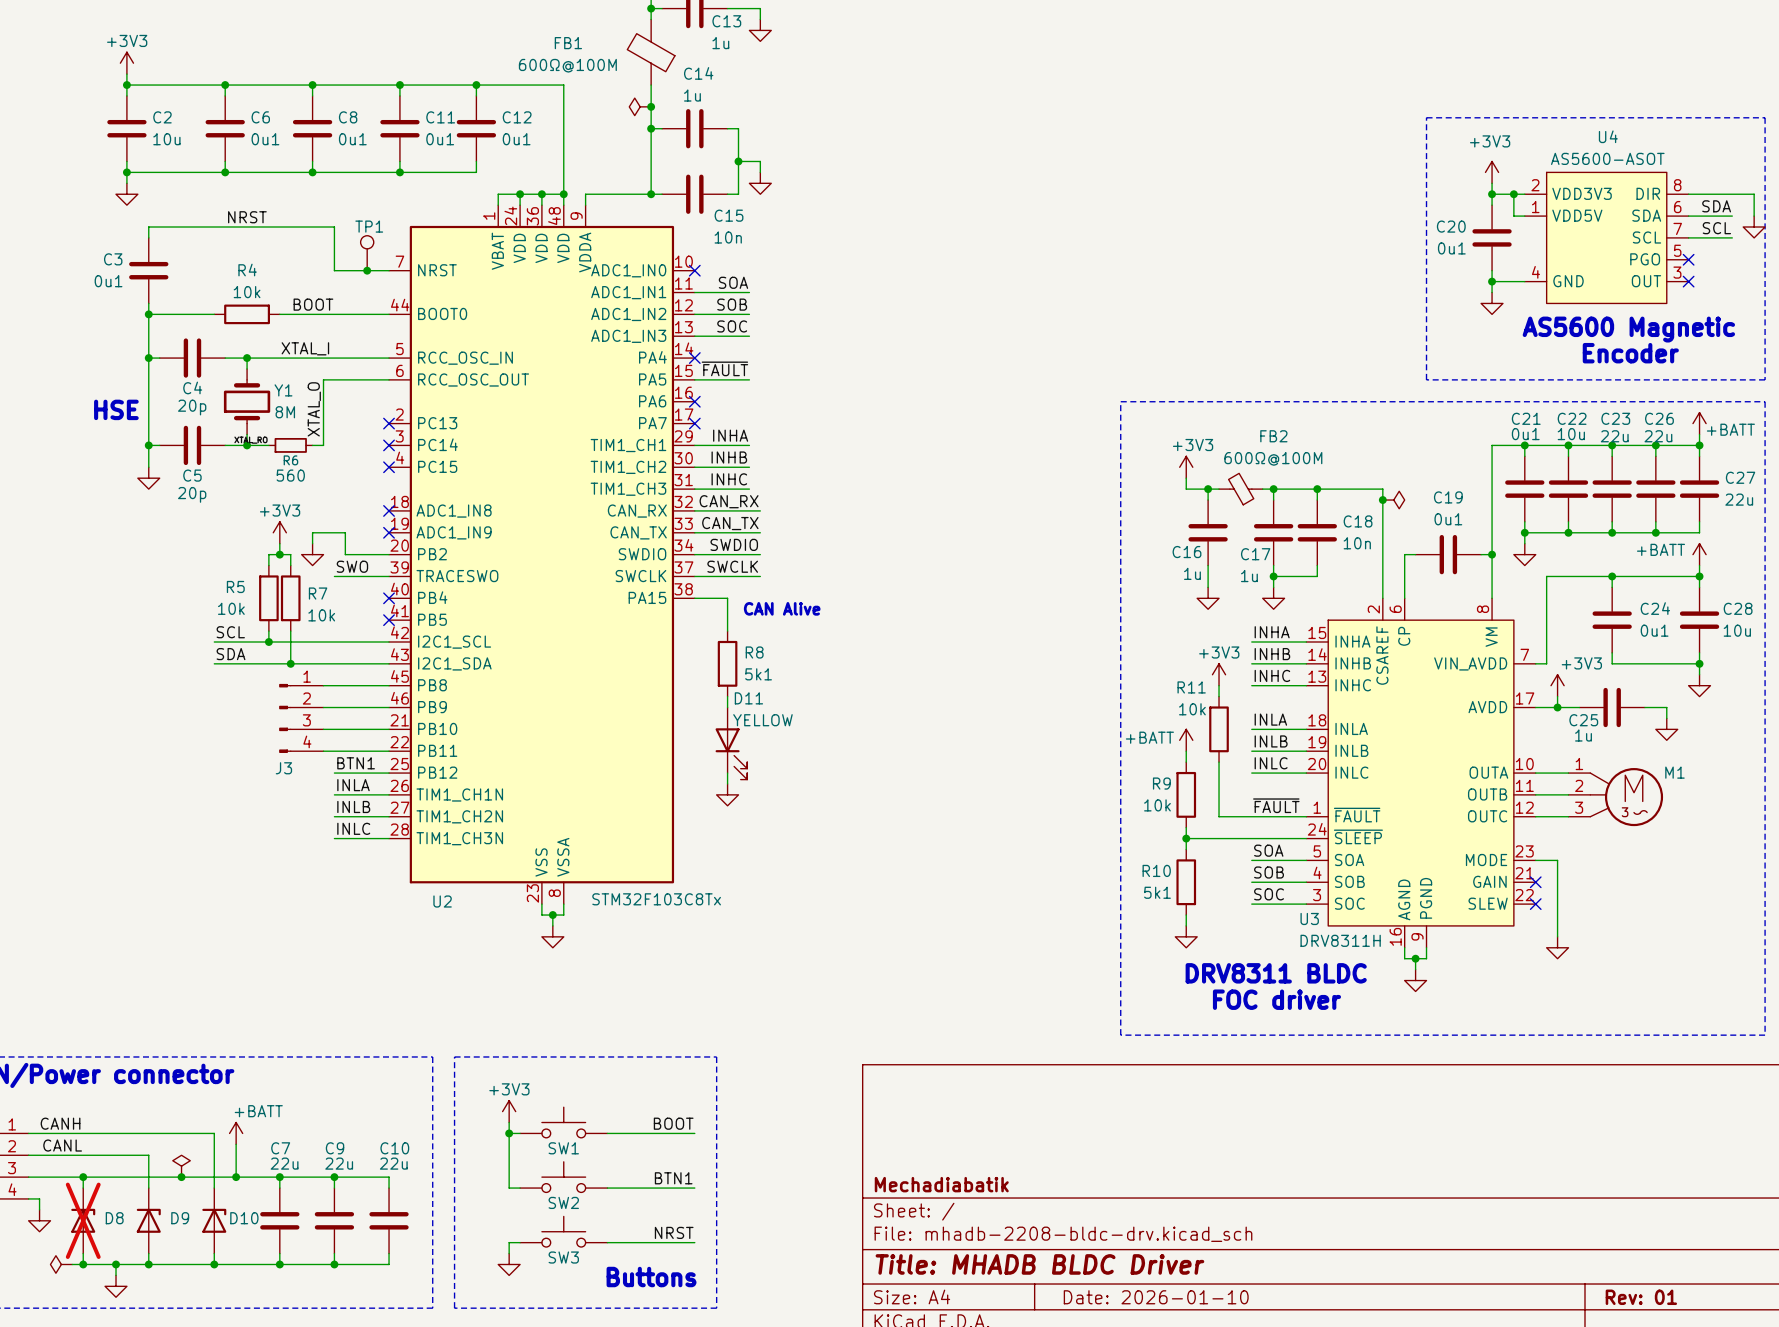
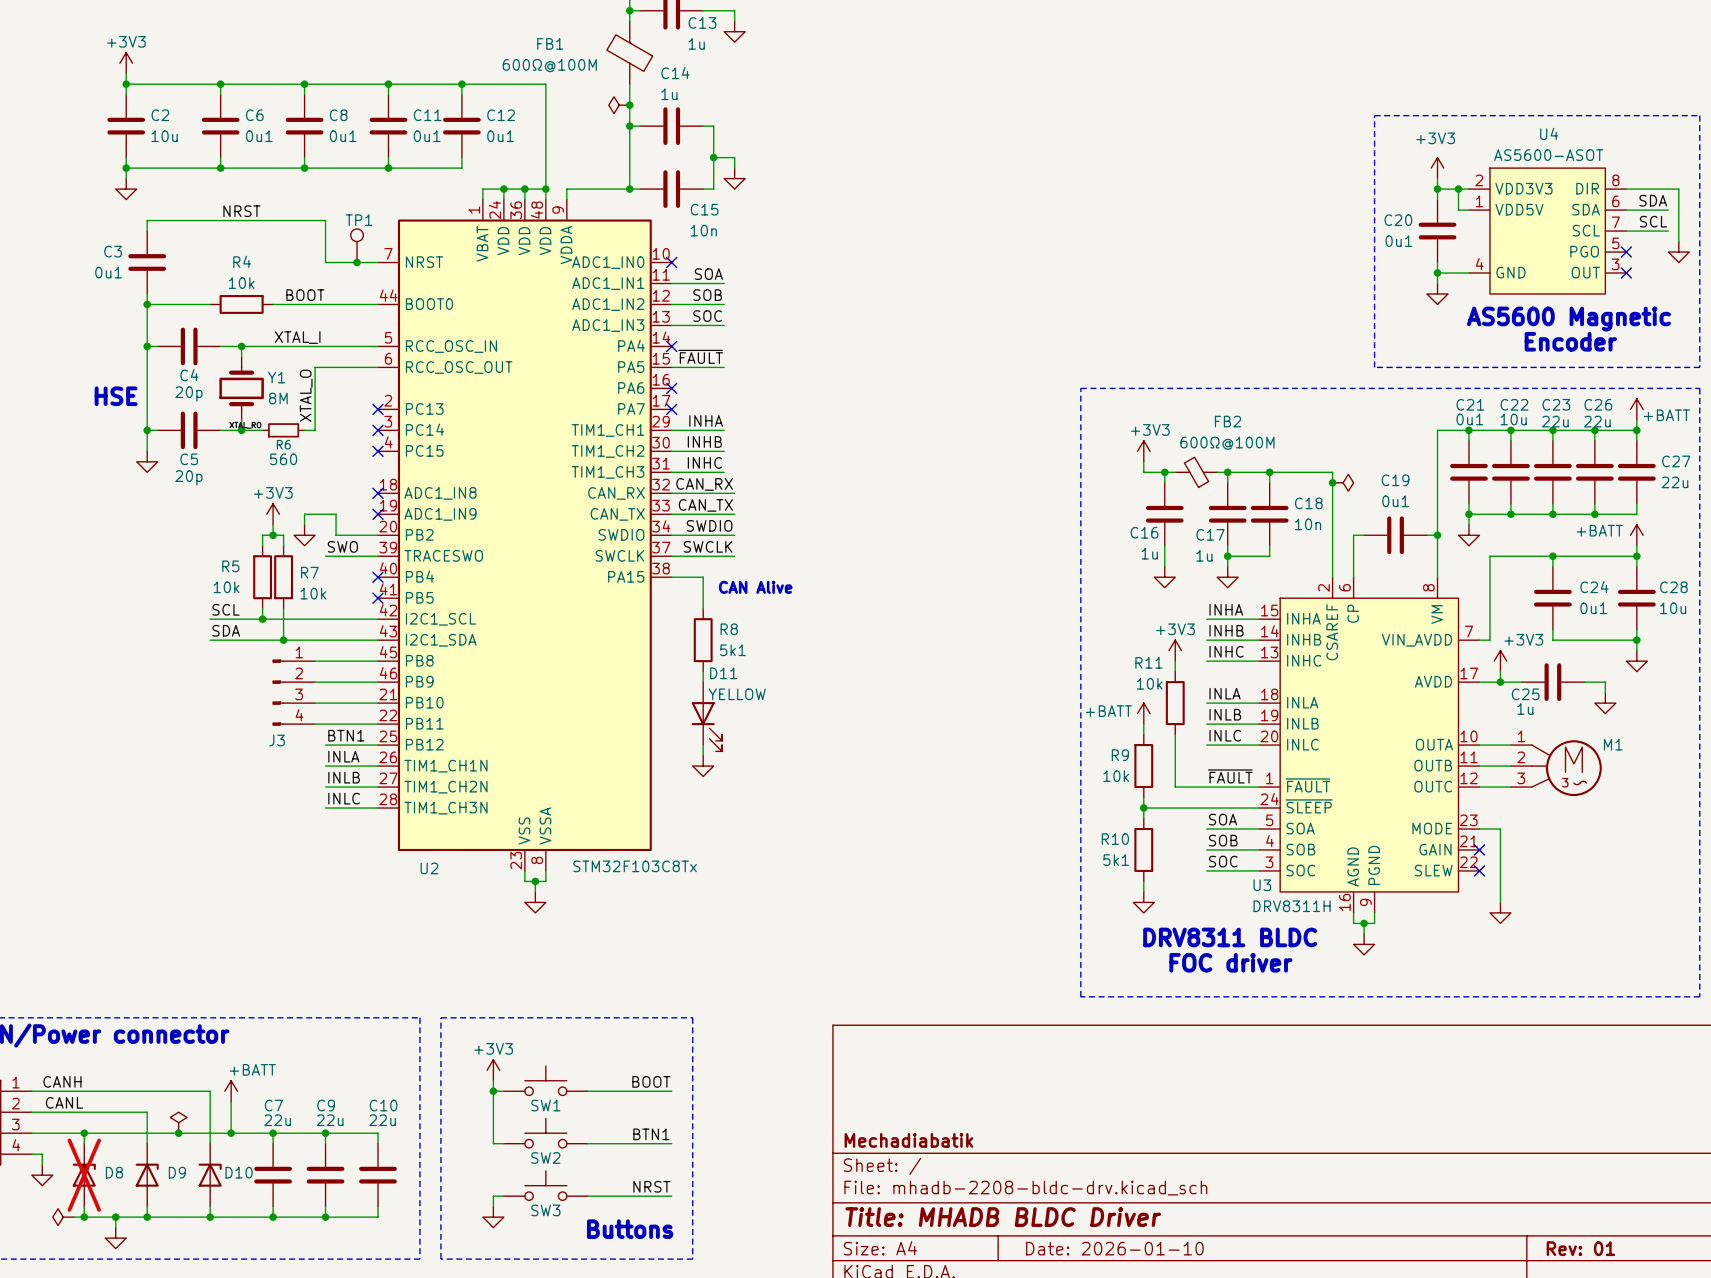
wire: (1743, 194) (1754, 194) (1754, 216) -> (1678, 189) (1678, 241)
power symbol position: (1754, 227) -> (1678, 252)

